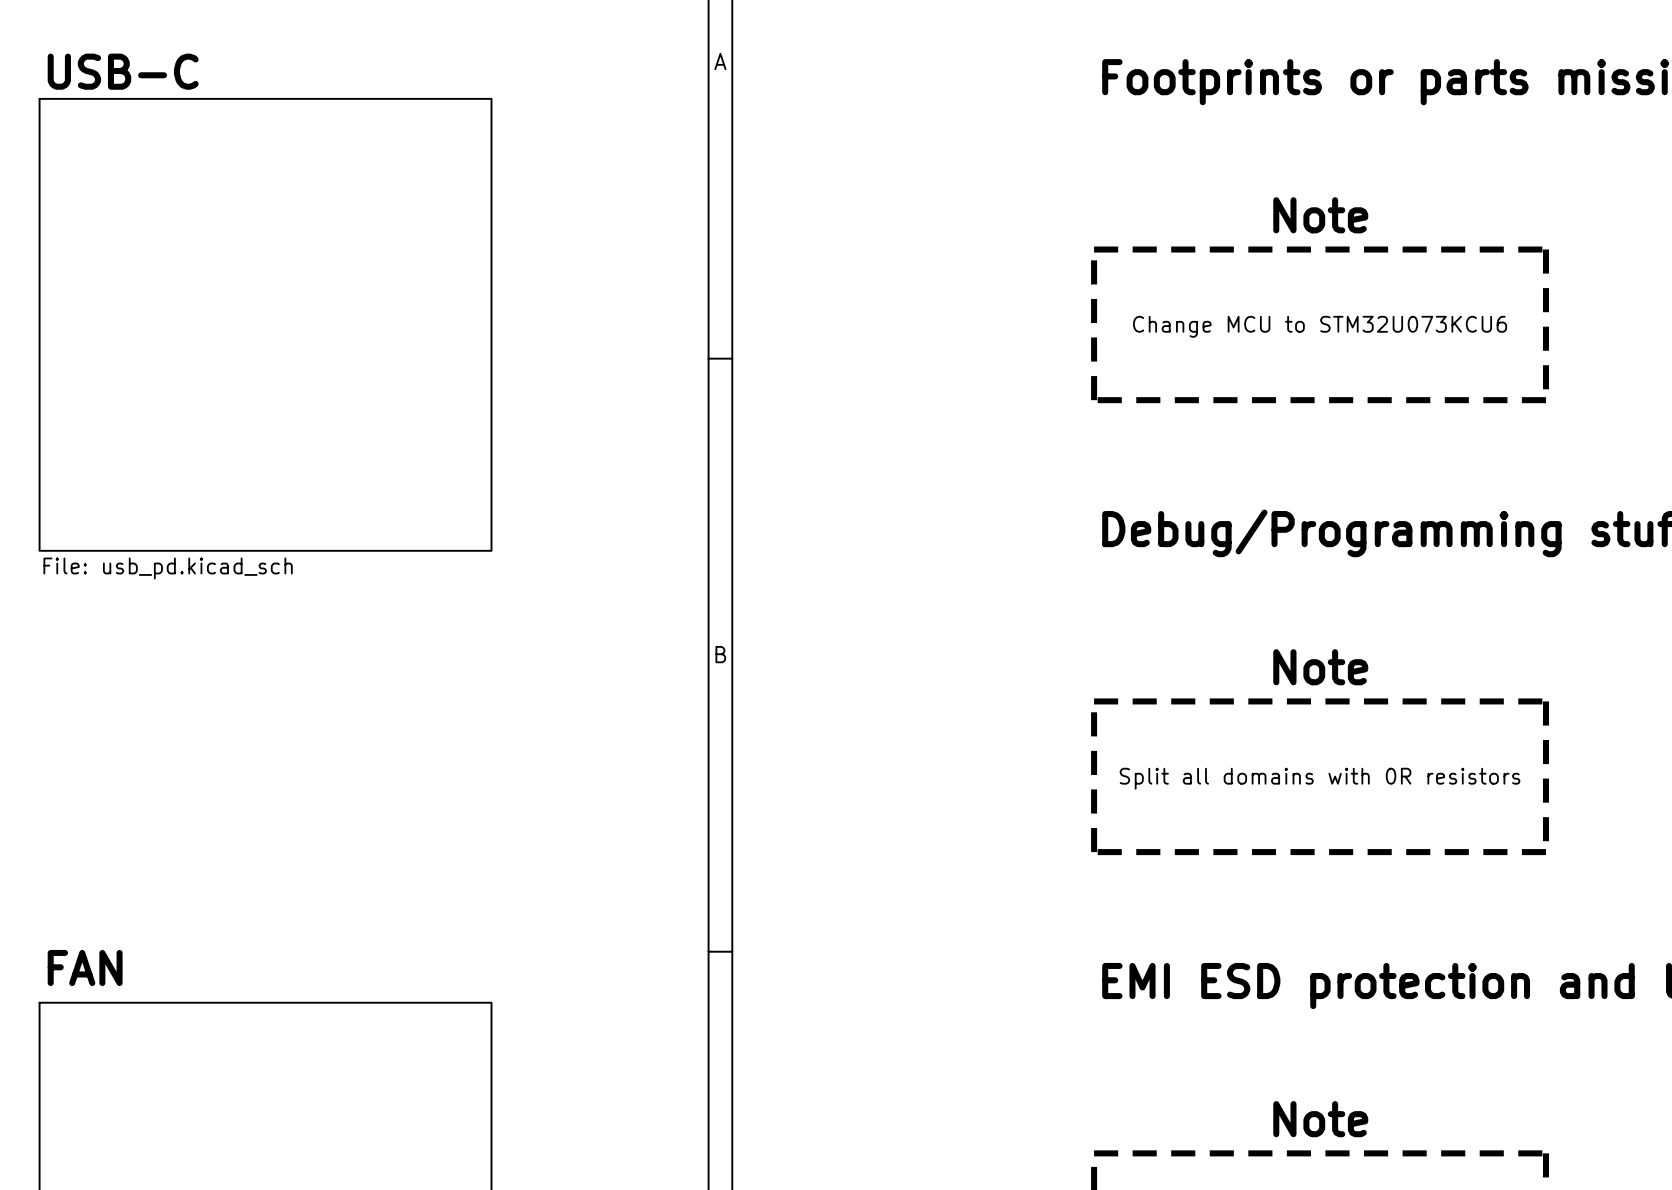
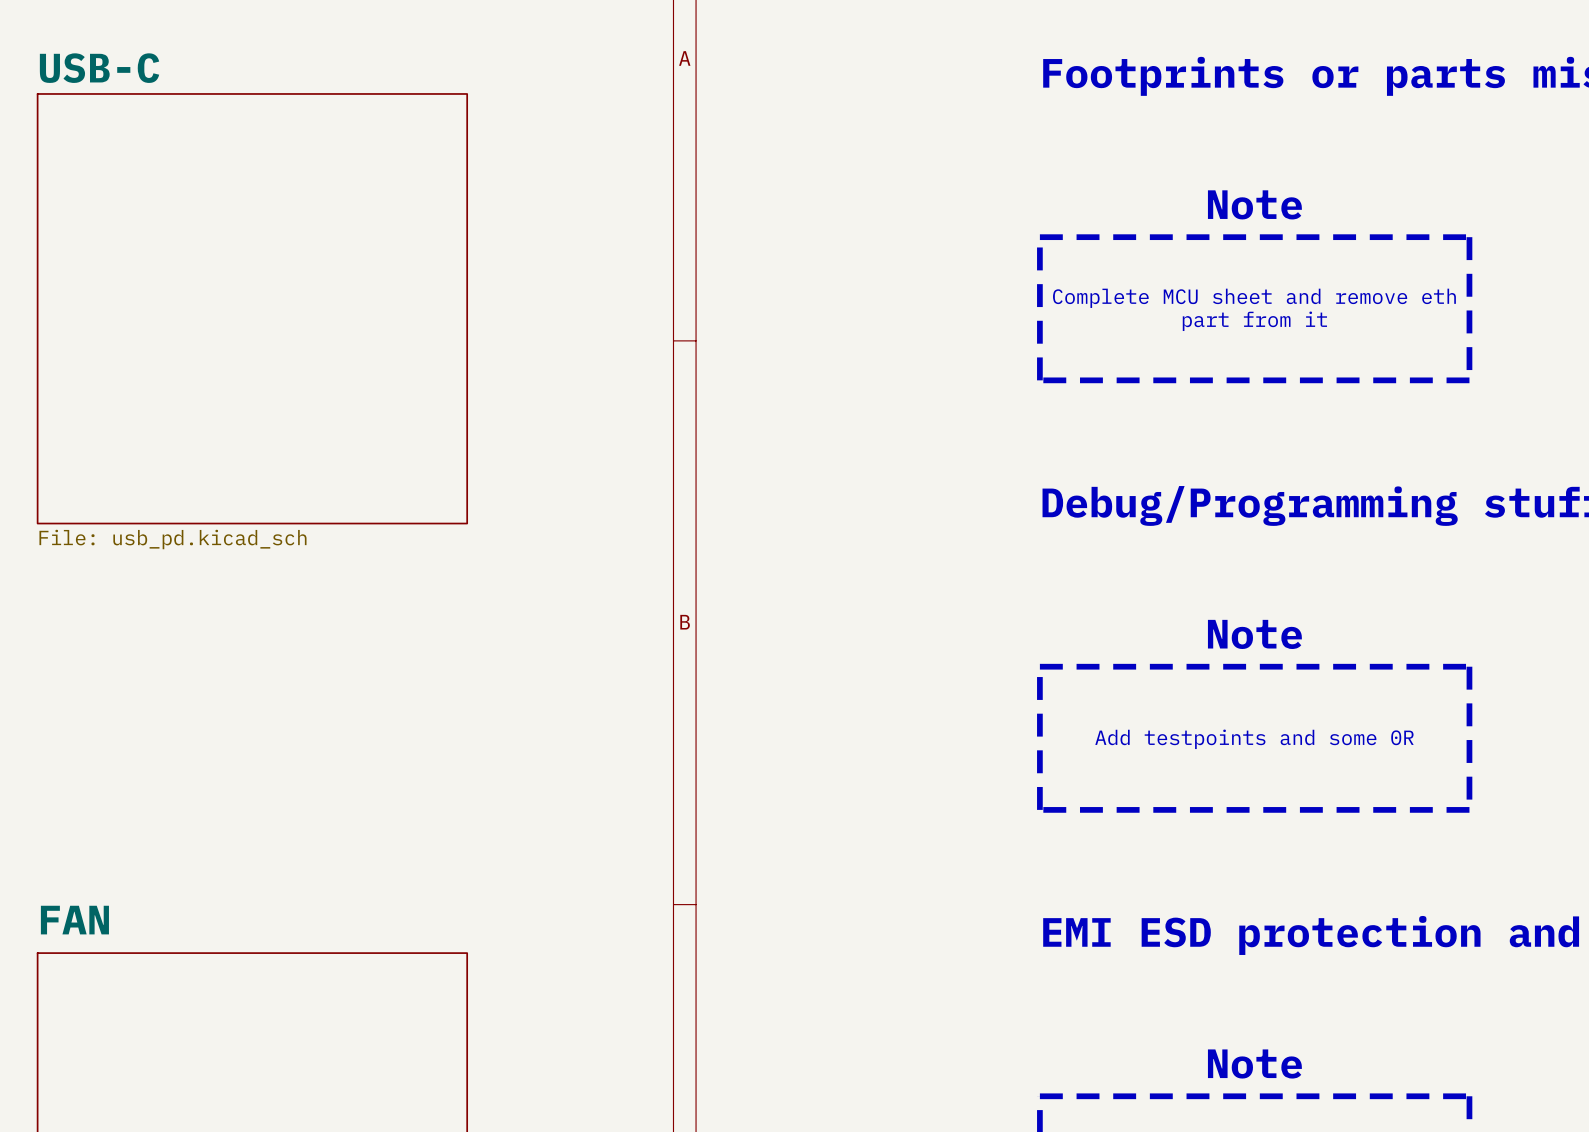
text: none -> Complete MCU sheet and remove eth (1254, 298)
text: Change MCU to STM32U073KCU6 (1320, 326) -> none
text: none -> part from it (1254, 321)
text: Split all domains with 0R resistors (1320, 778) -> Add testpoints and some 0R (1254, 739)

